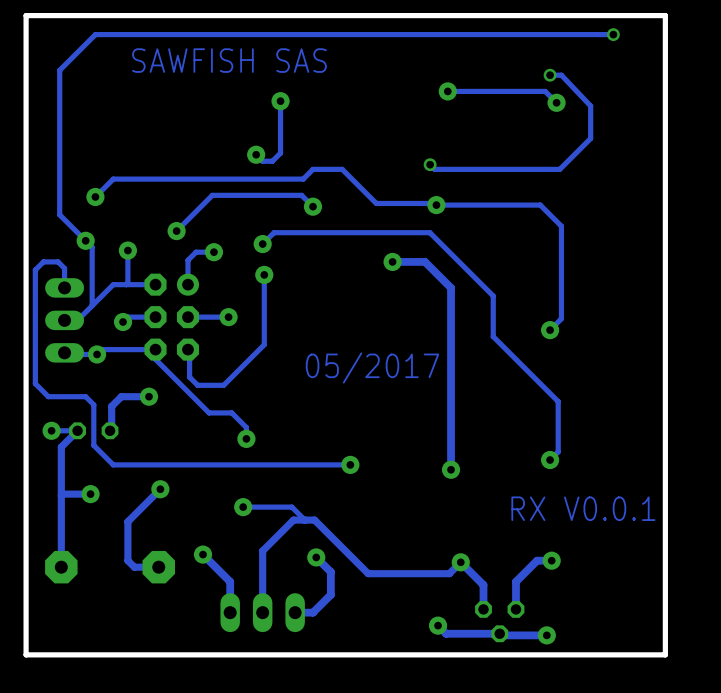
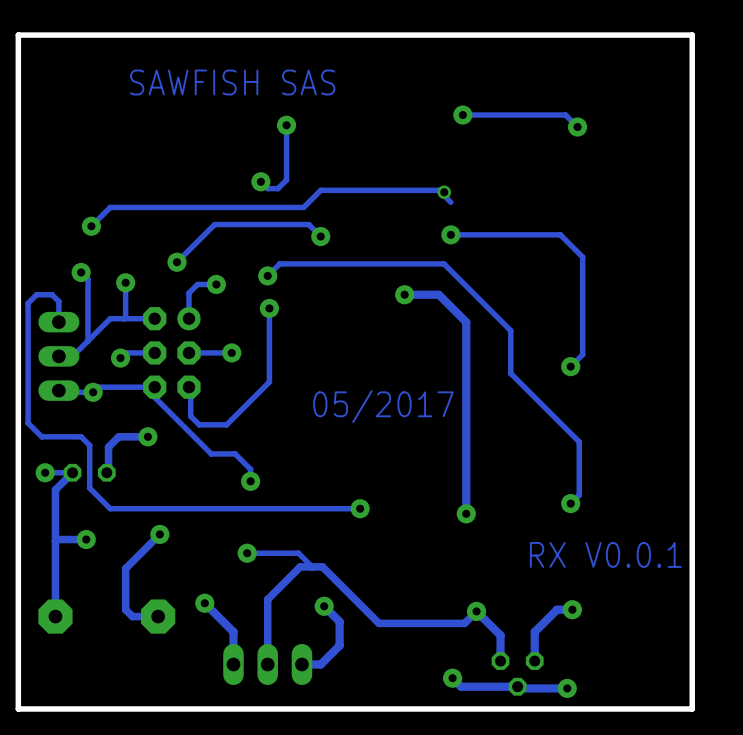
track: (613, 34) (95, 34) (59, 70) (59, 214) (85, 240) -> none
via: (613, 34) -> none
track: (550, 75) (561, 75) (590, 106) (590, 138) (559, 169) (434, 169) (430, 164) -> none
via: (550, 75) -> none
track: (296, 179) (303, 179) (313, 169) (342, 169) (376, 203) (434, 203) (436, 205) -> (303, 207) (320, 190) (438, 190) (450, 202)

